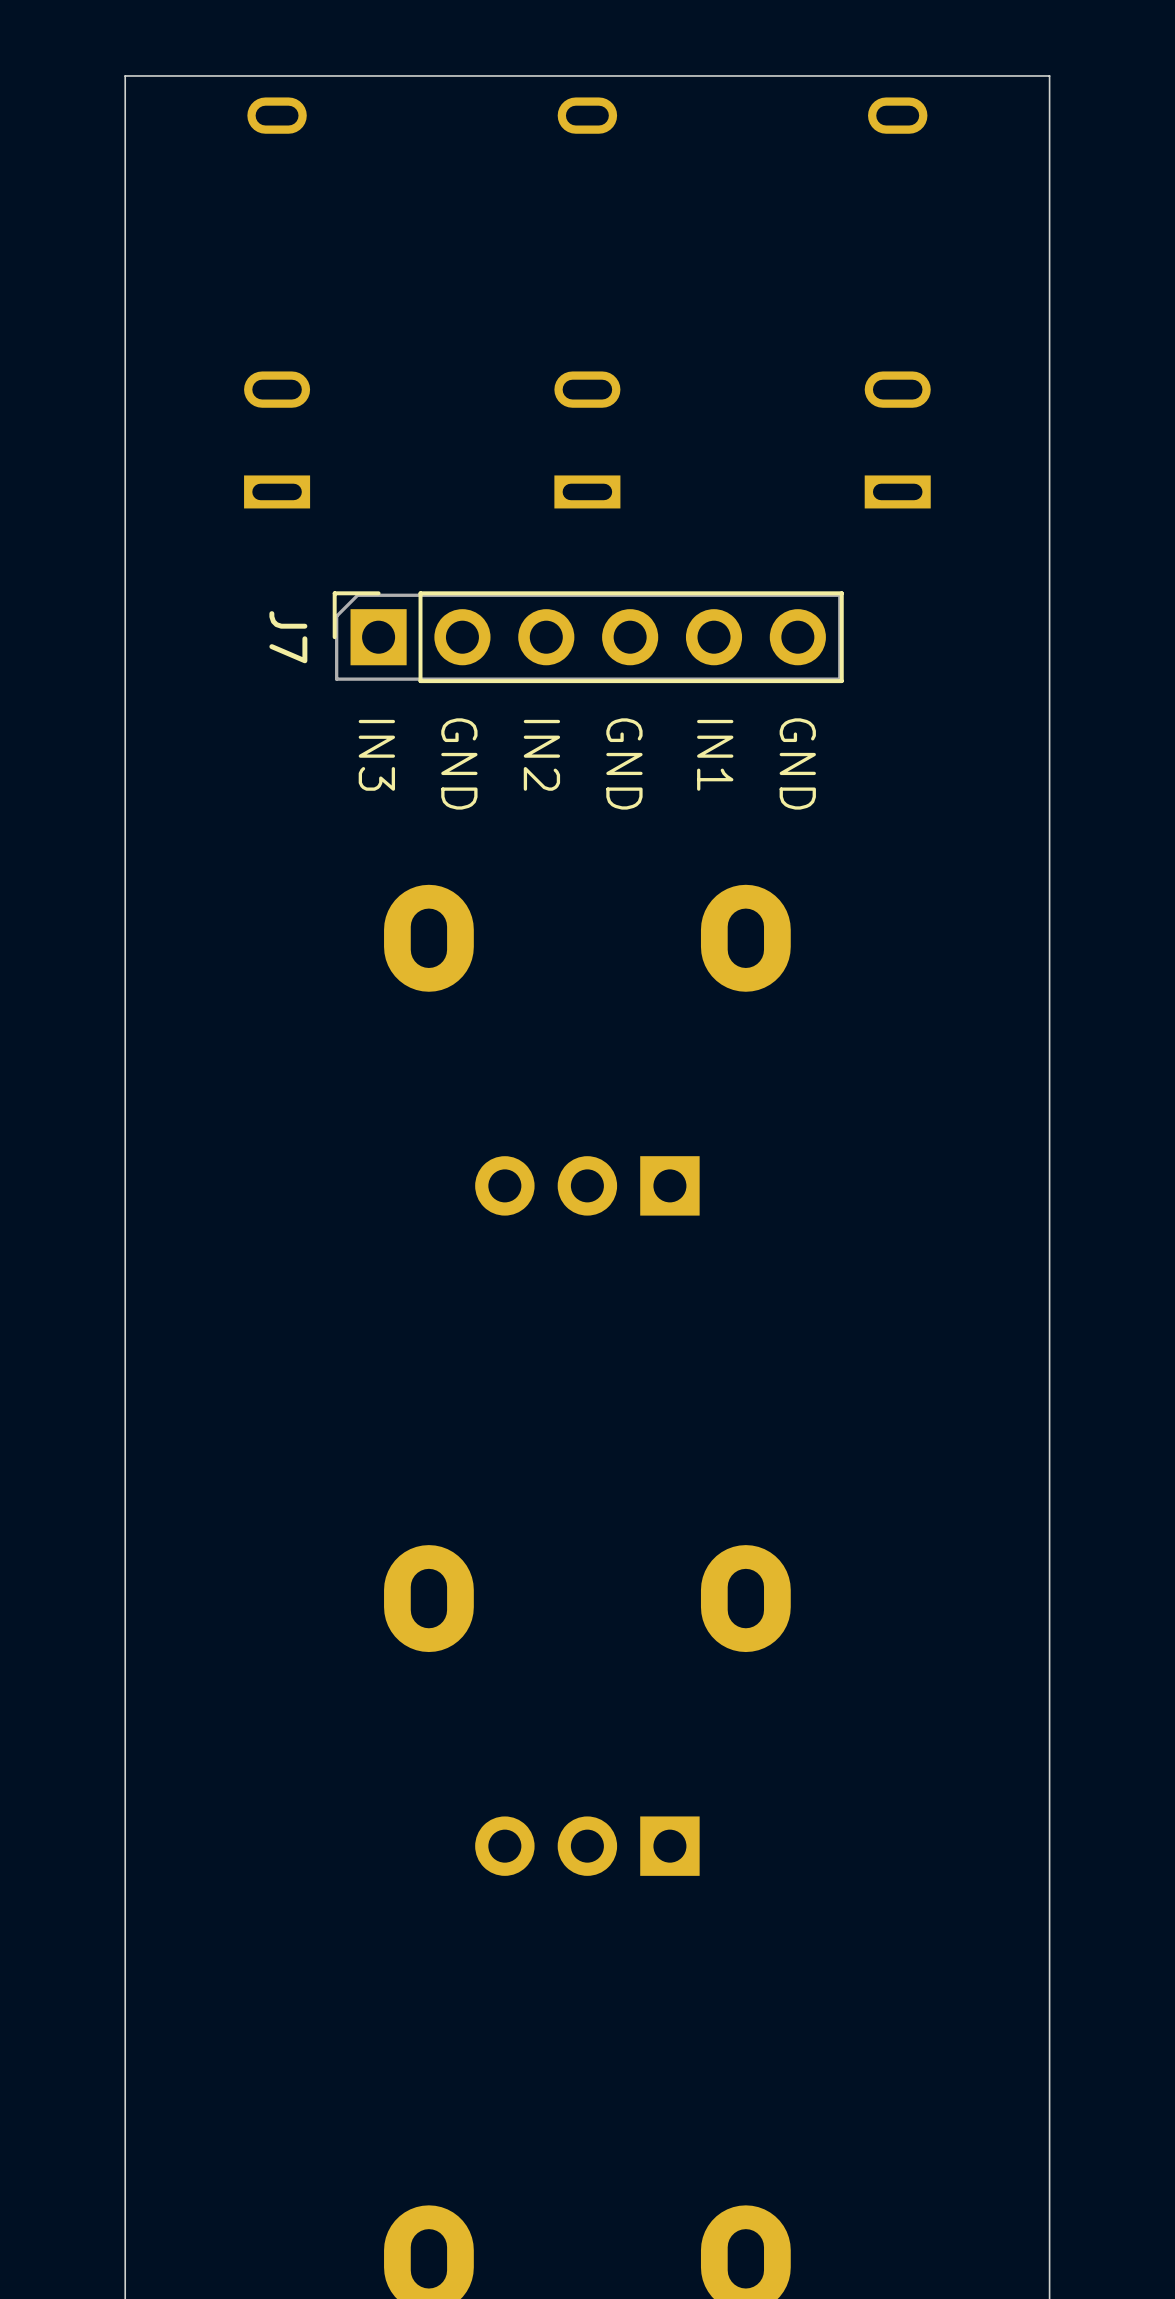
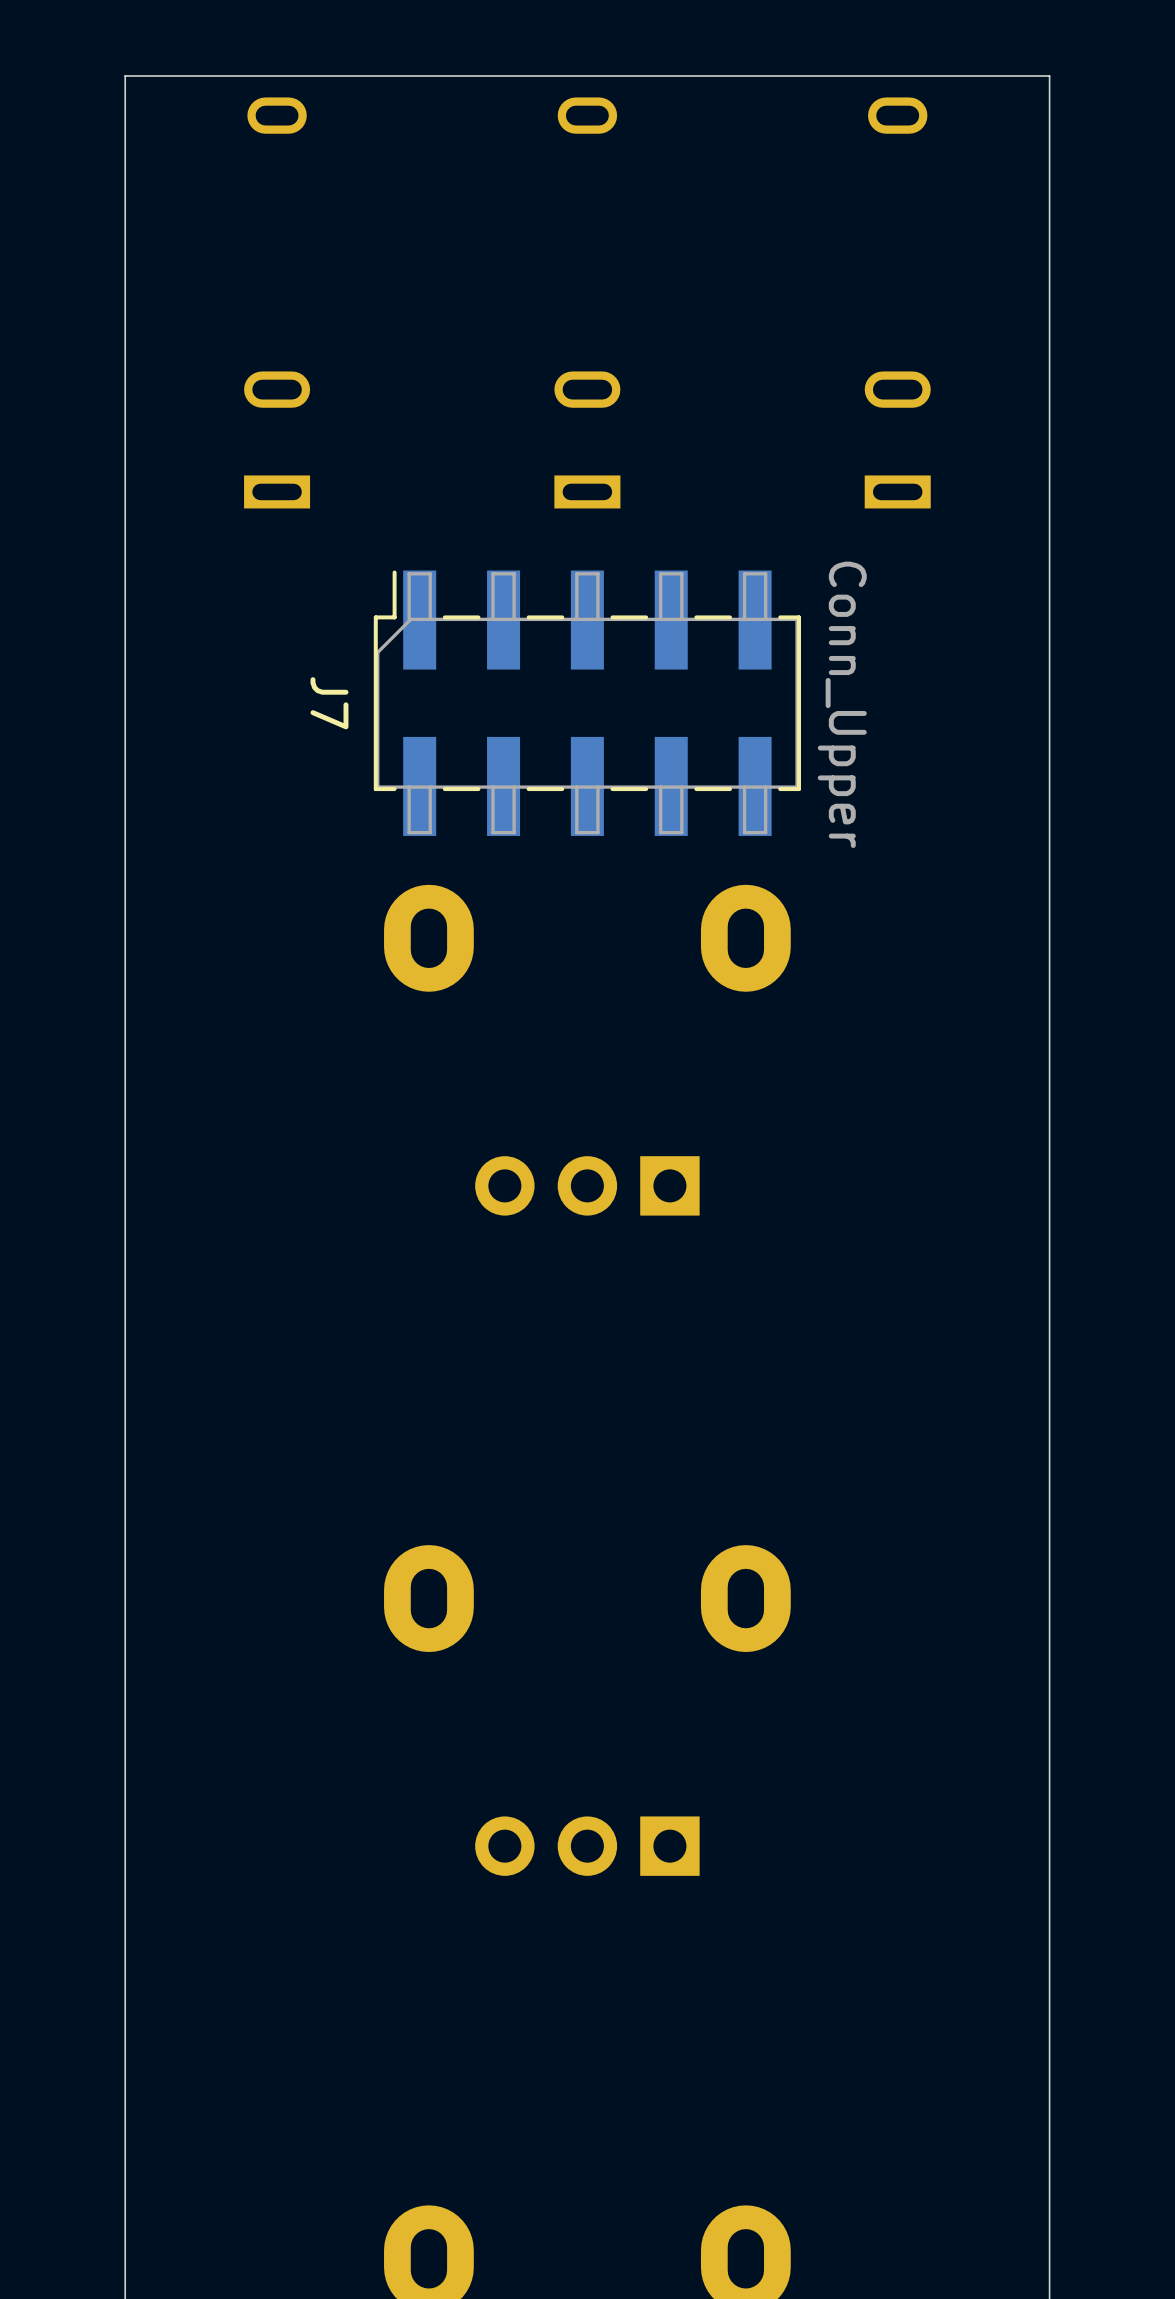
J7 footprint: [332, 591, 844, 684] -> [373, 570, 801, 836]
J7 value: none -> Conn_Upper (842, 704)
text: IN3 (376, 755) -> none
text: IN2 (541, 755) -> none
text: IN1 (715, 755) -> none
text: GND (459, 763) -> none
text: GND (624, 763) -> none
text: GND (797, 763) -> none

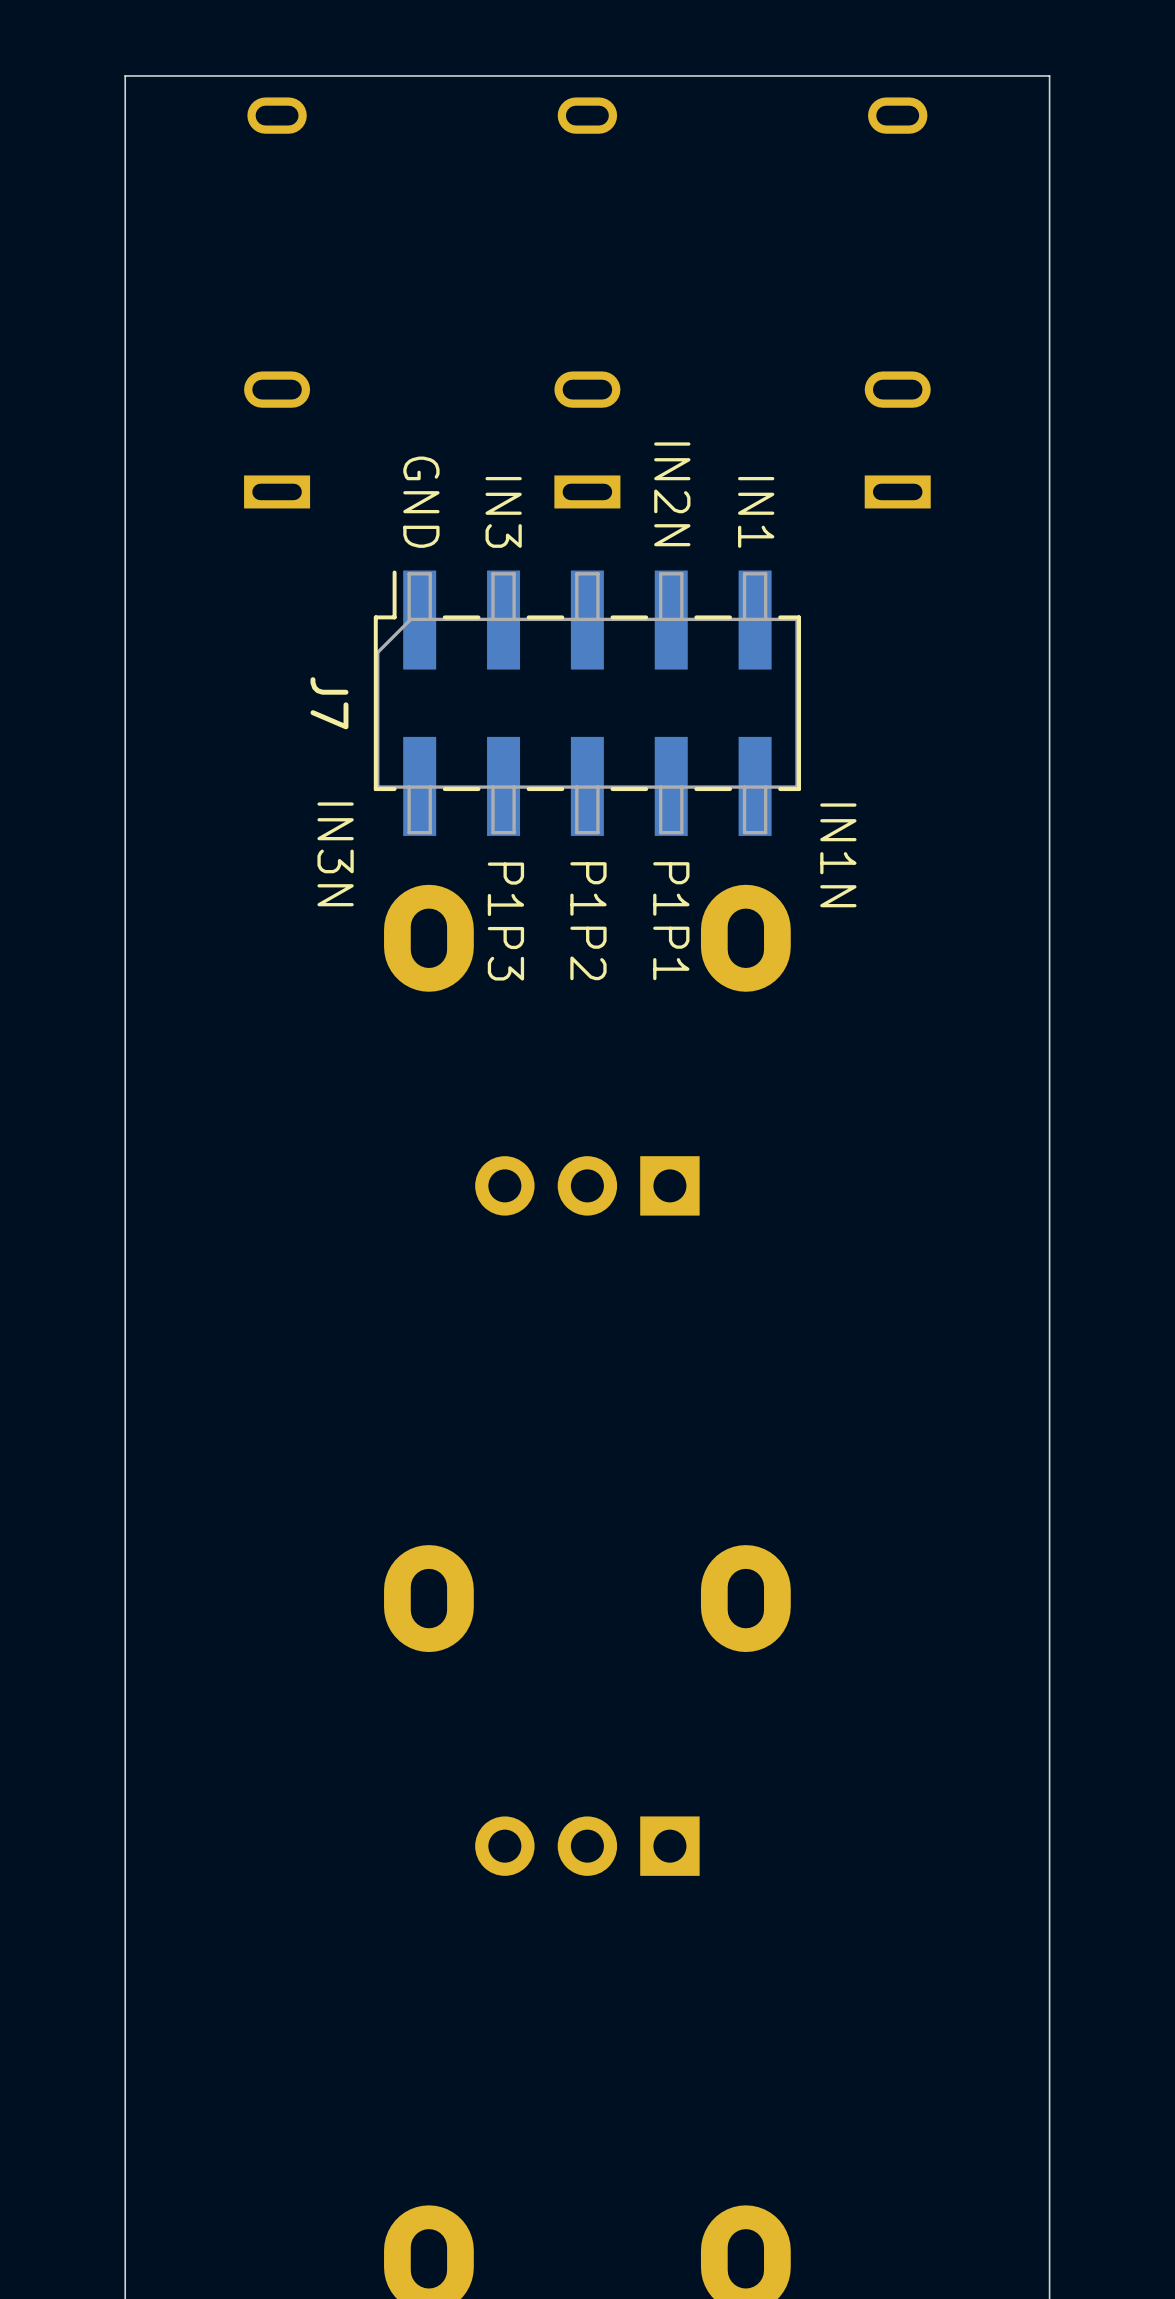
text: none -> IN2N (672, 494)
text: none -> GND (421, 502)
text: none -> IN3 (503, 512)
text: none -> IN1 (756, 512)
J7 value: Conn_Upper (842, 704) -> none
text: none -> IN3N (335, 854)
text: none -> IN1N (838, 855)
text: none -> P1P3 (505, 921)
text: none -> P1P2 (588, 921)
text: none -> P1P1 (671, 921)

